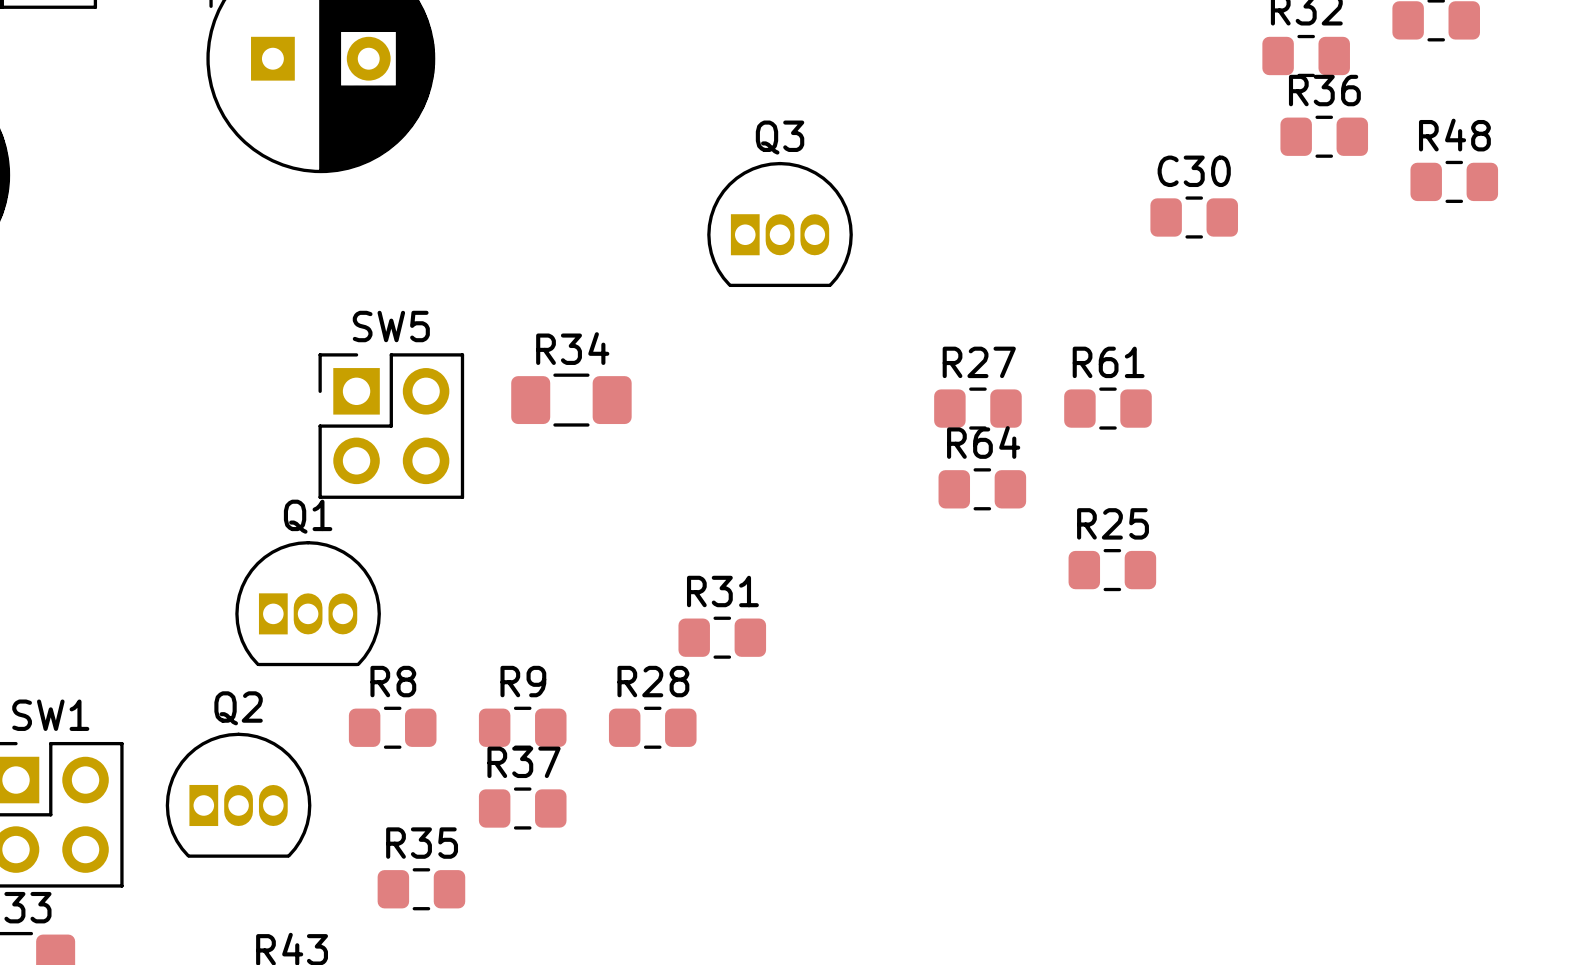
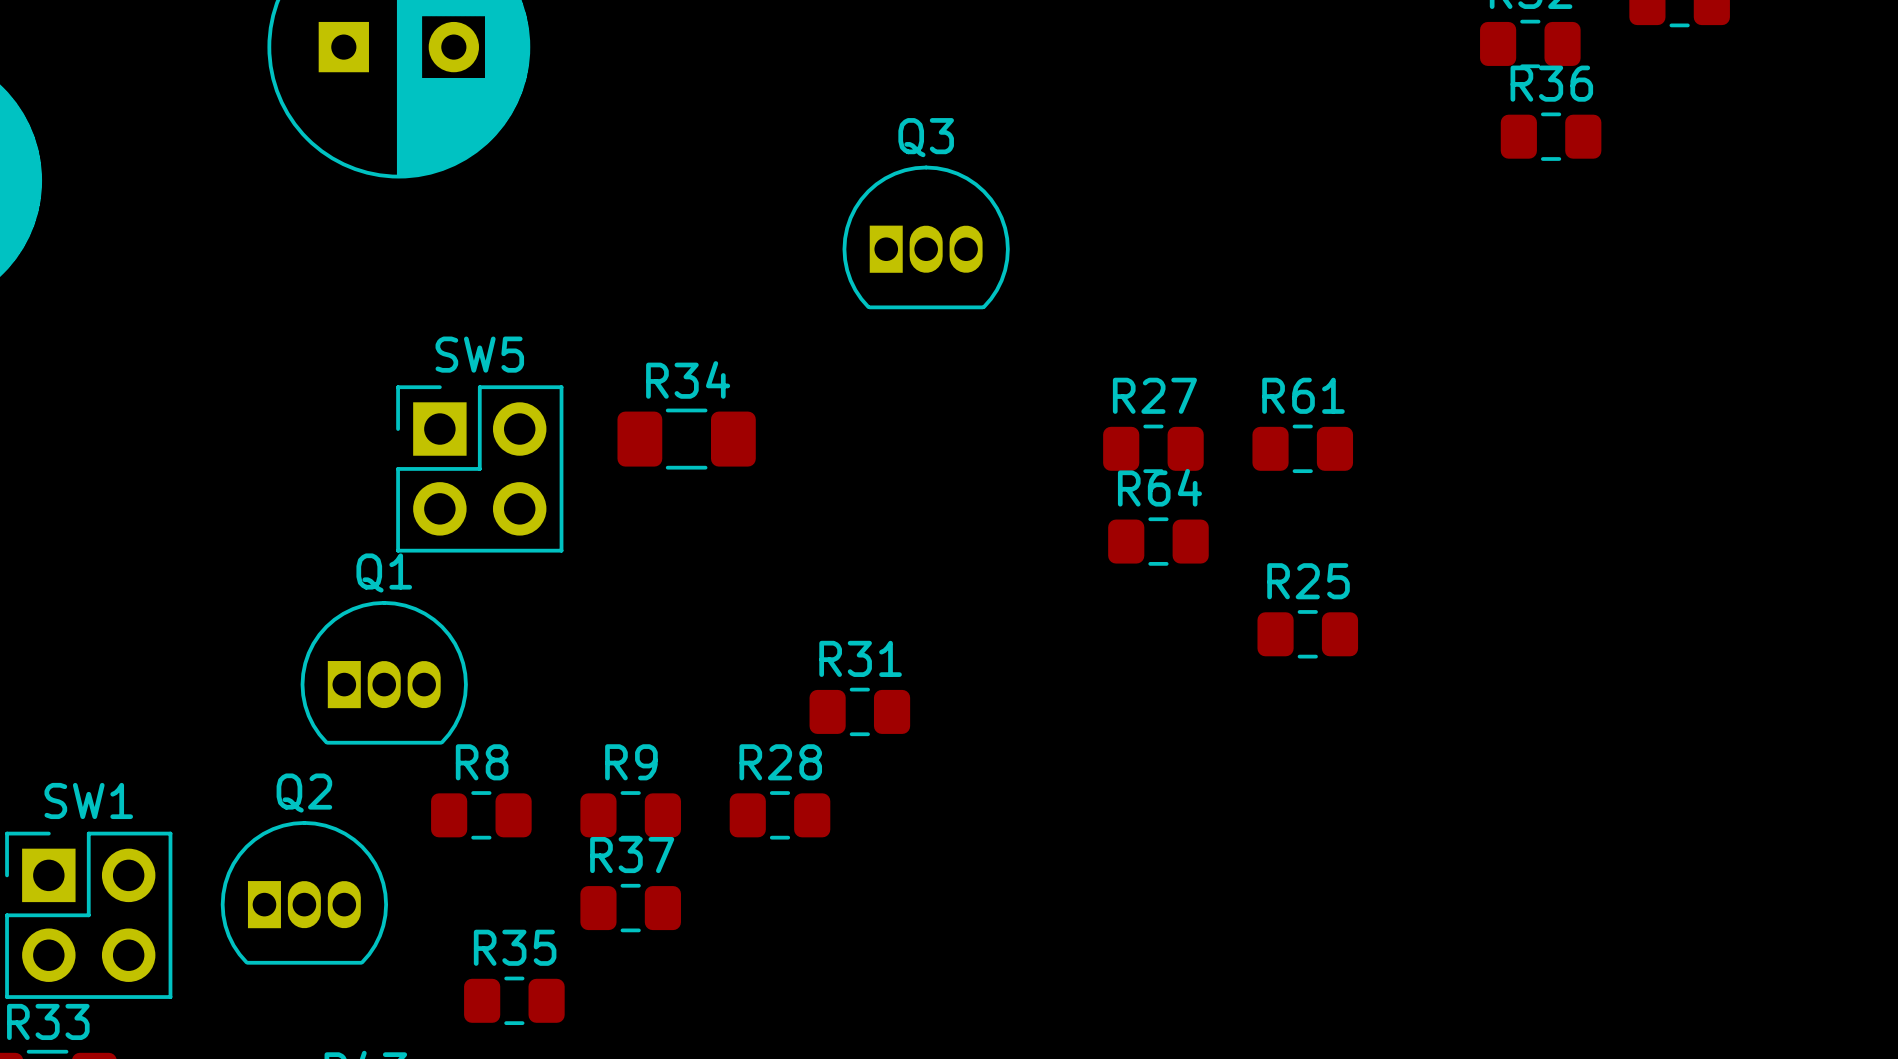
R48: (1454, 181) -> none
C30: (1194, 217) -> none

